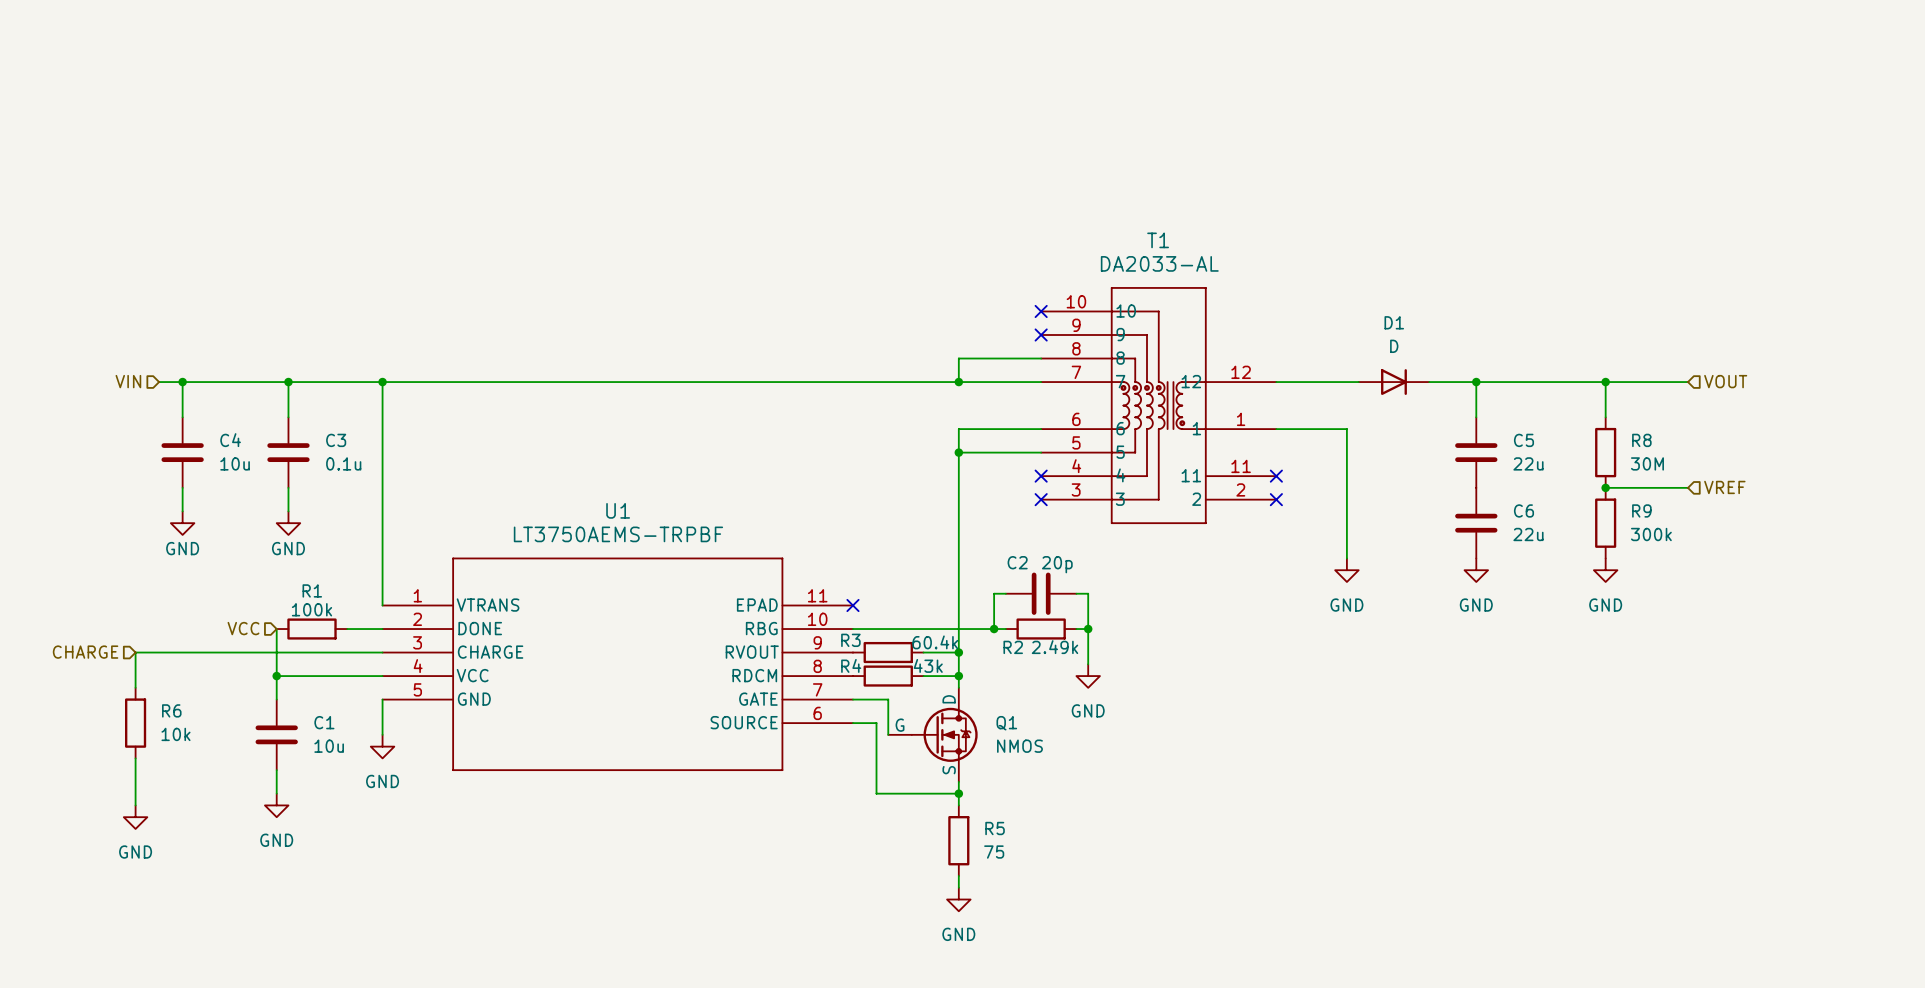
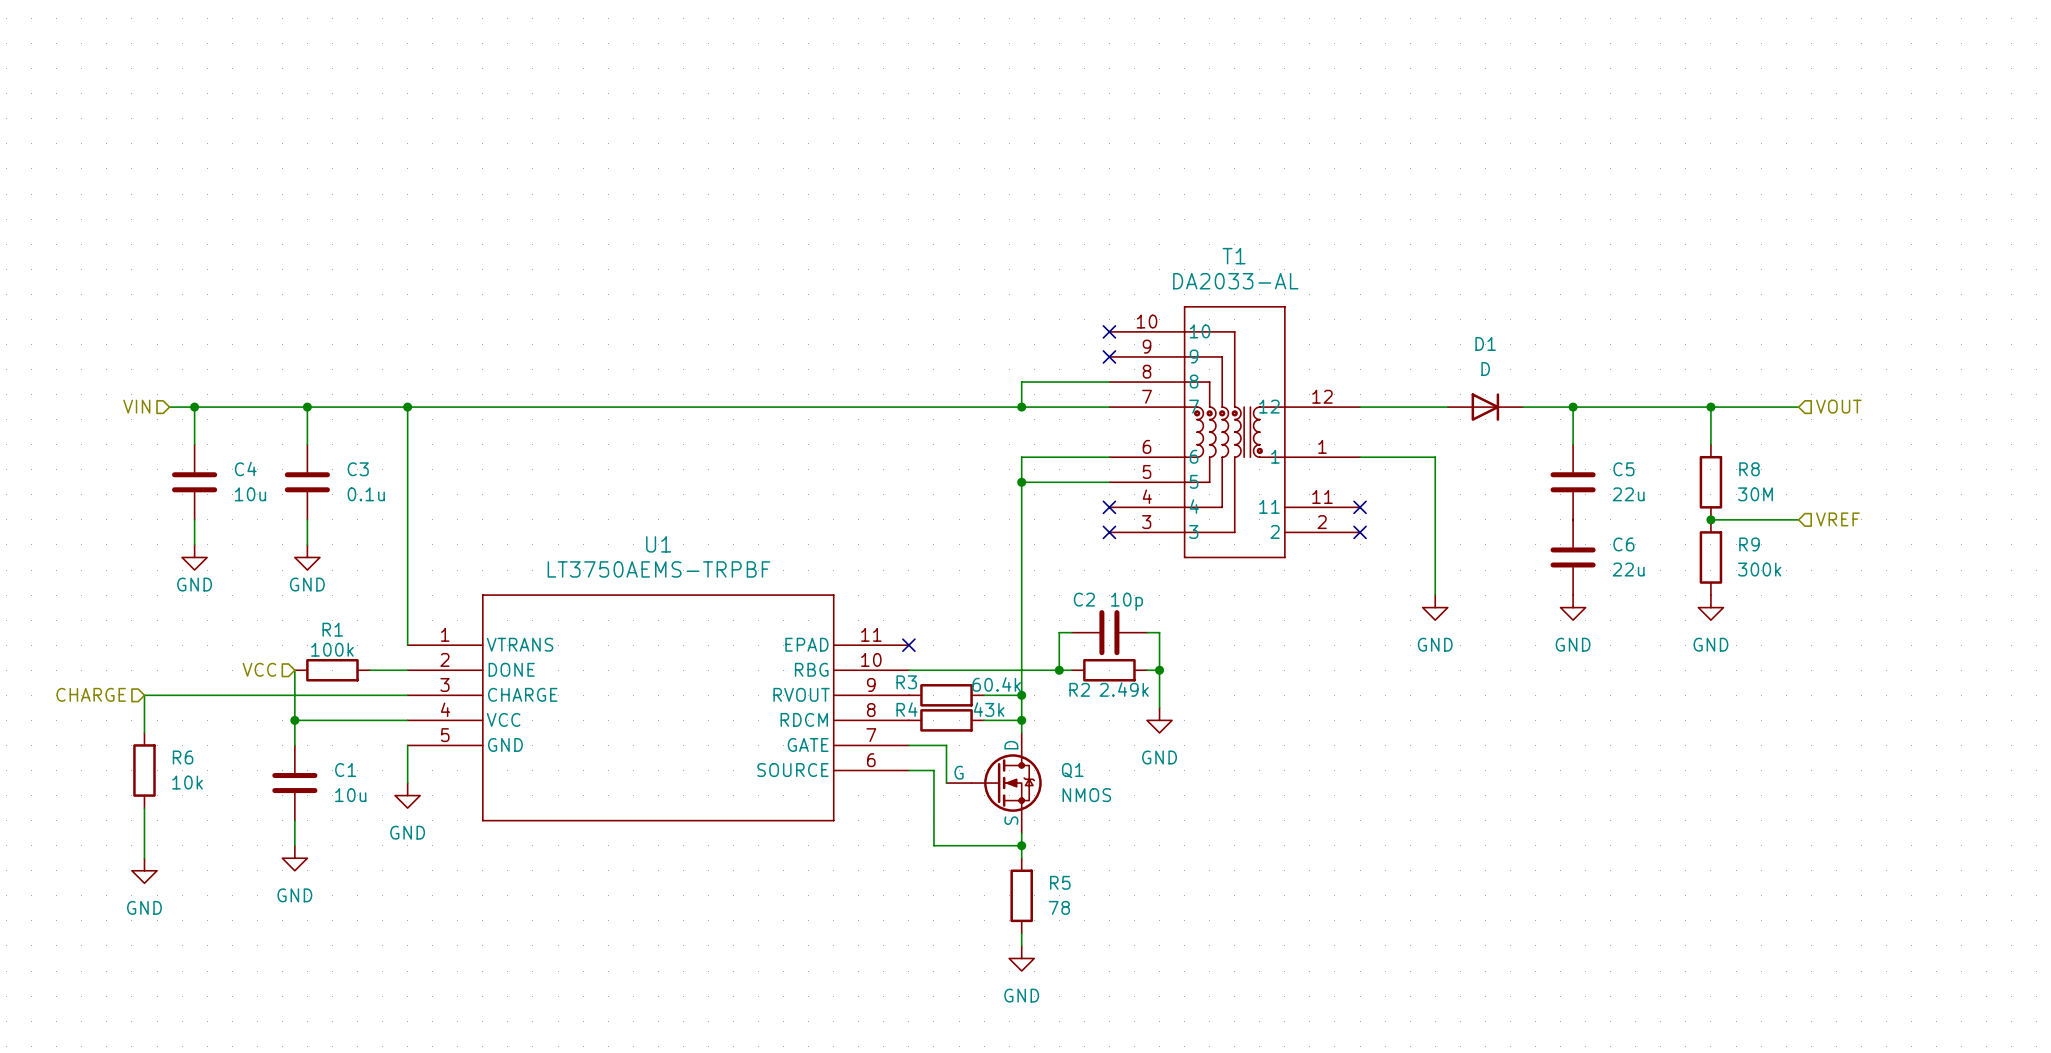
C2 value: 20p (1057, 564) -> 10p (1126, 601)
R5 value: 75 (994, 852) -> 78 (1059, 907)

